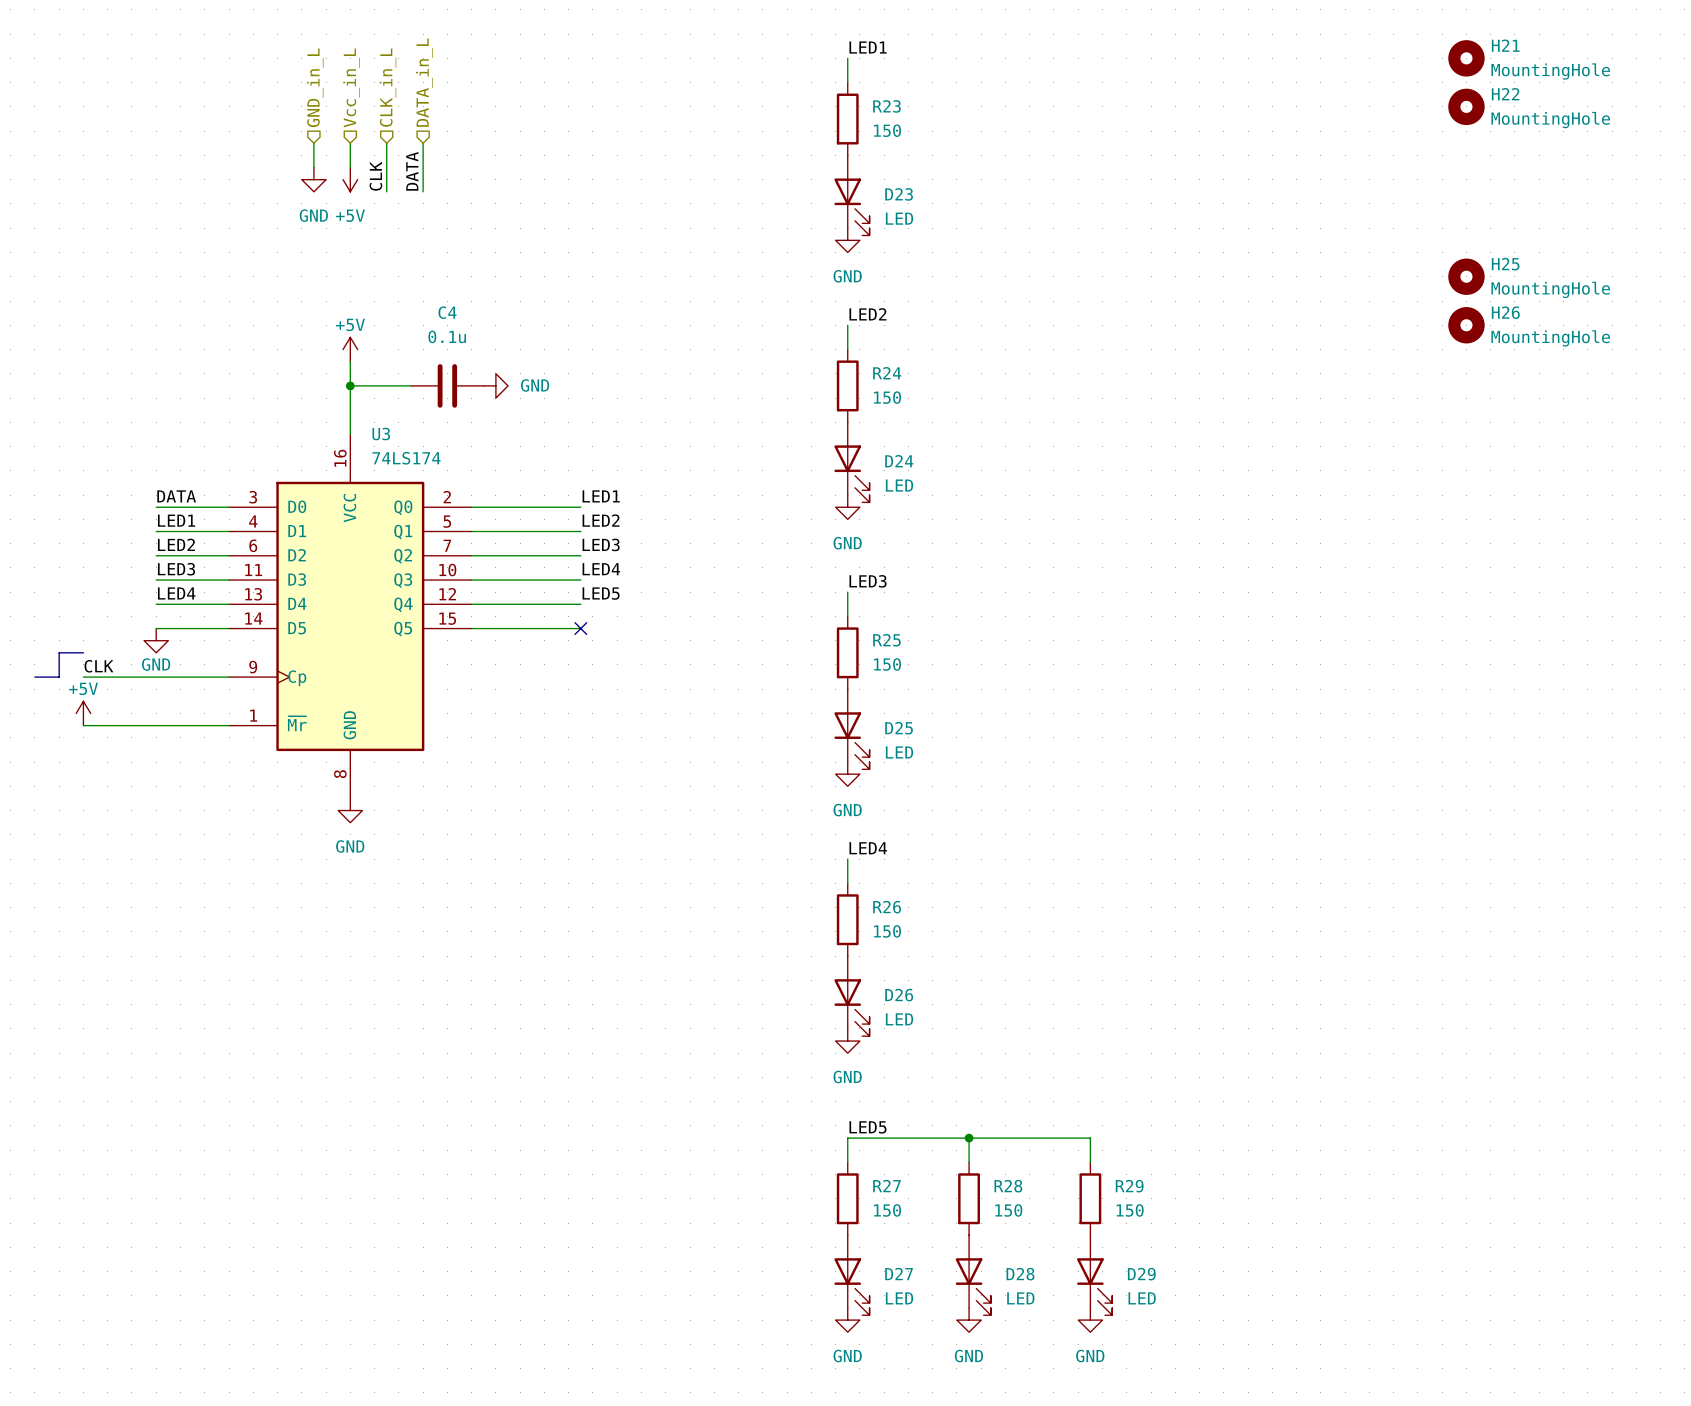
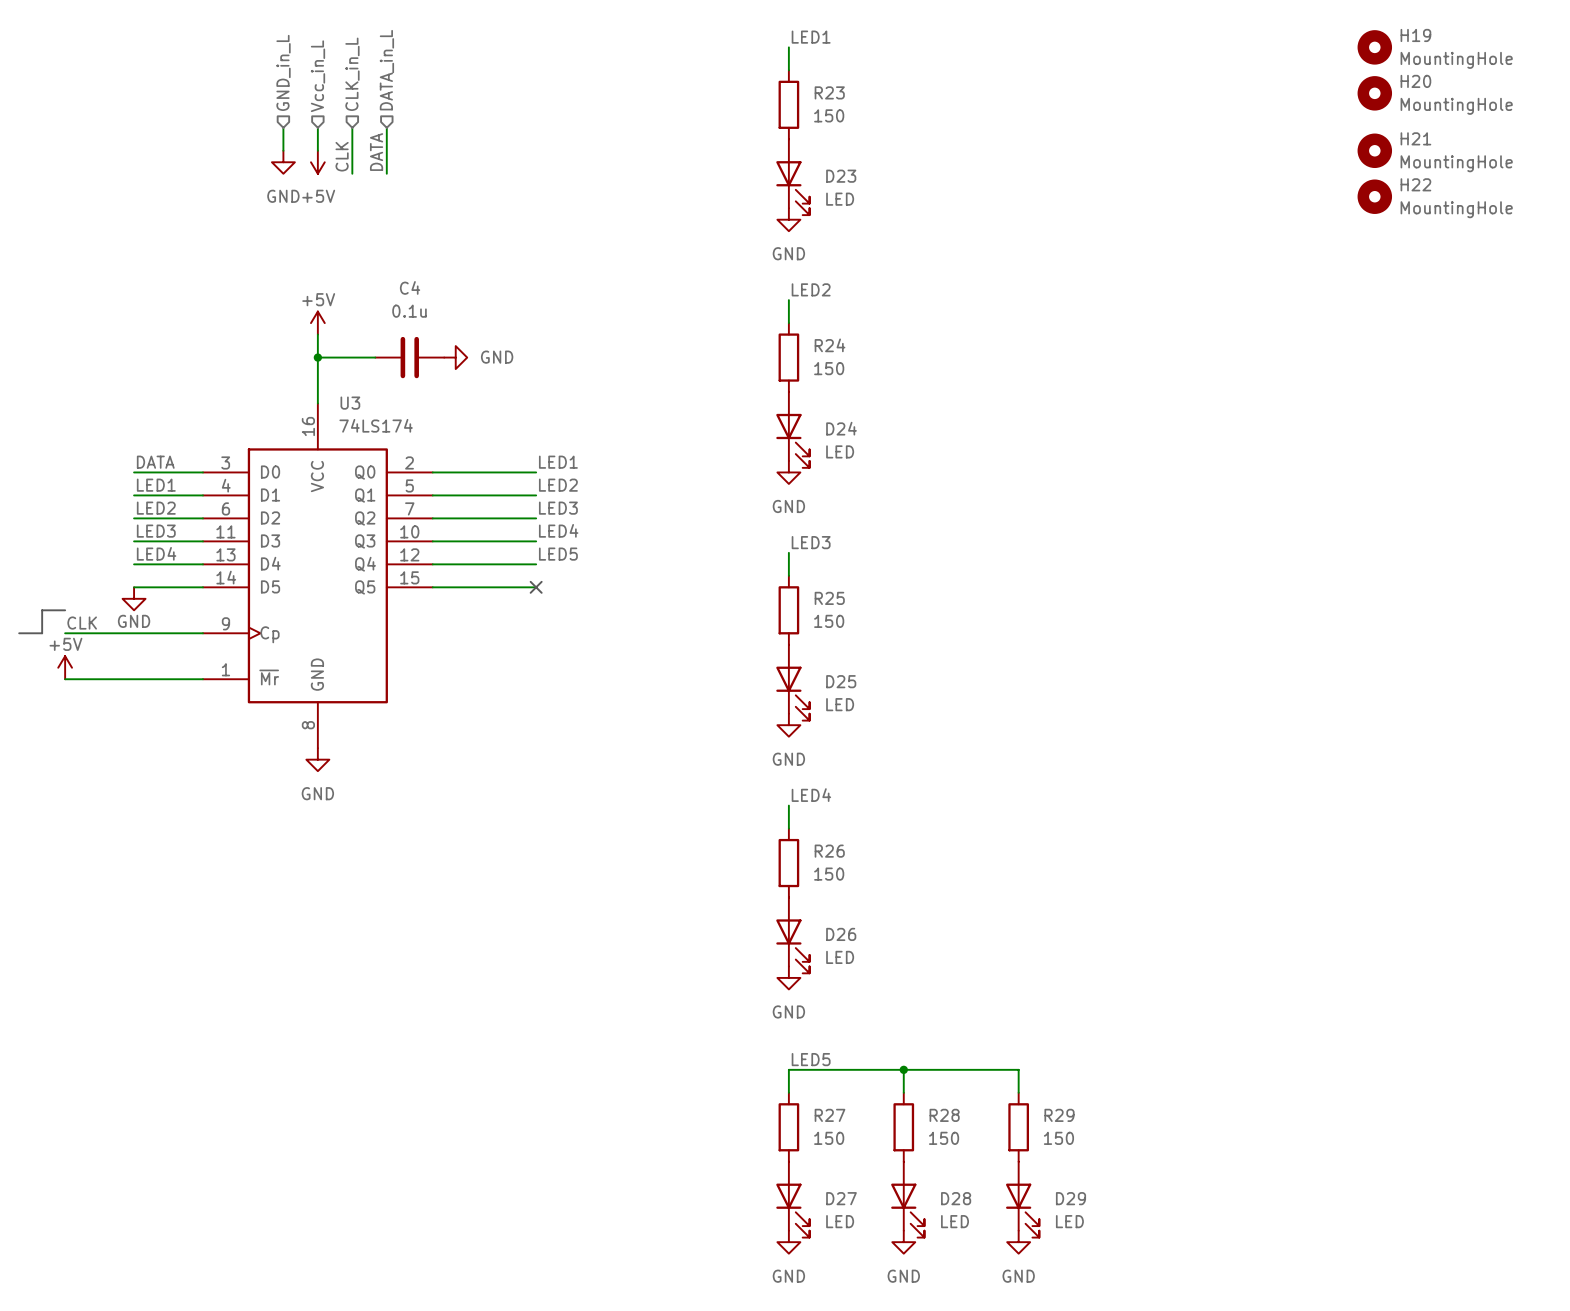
H21 name: H21 (1505, 45) -> H19 (1415, 35)
H22 name: H22 (1505, 94) -> H20 (1415, 81)
H21: none -> MountingHole (1374, 150)
H22: none -> MountingHole (1374, 196)
H25: MountingHole (1466, 276) -> none
H26: MountingHole (1466, 325) -> none

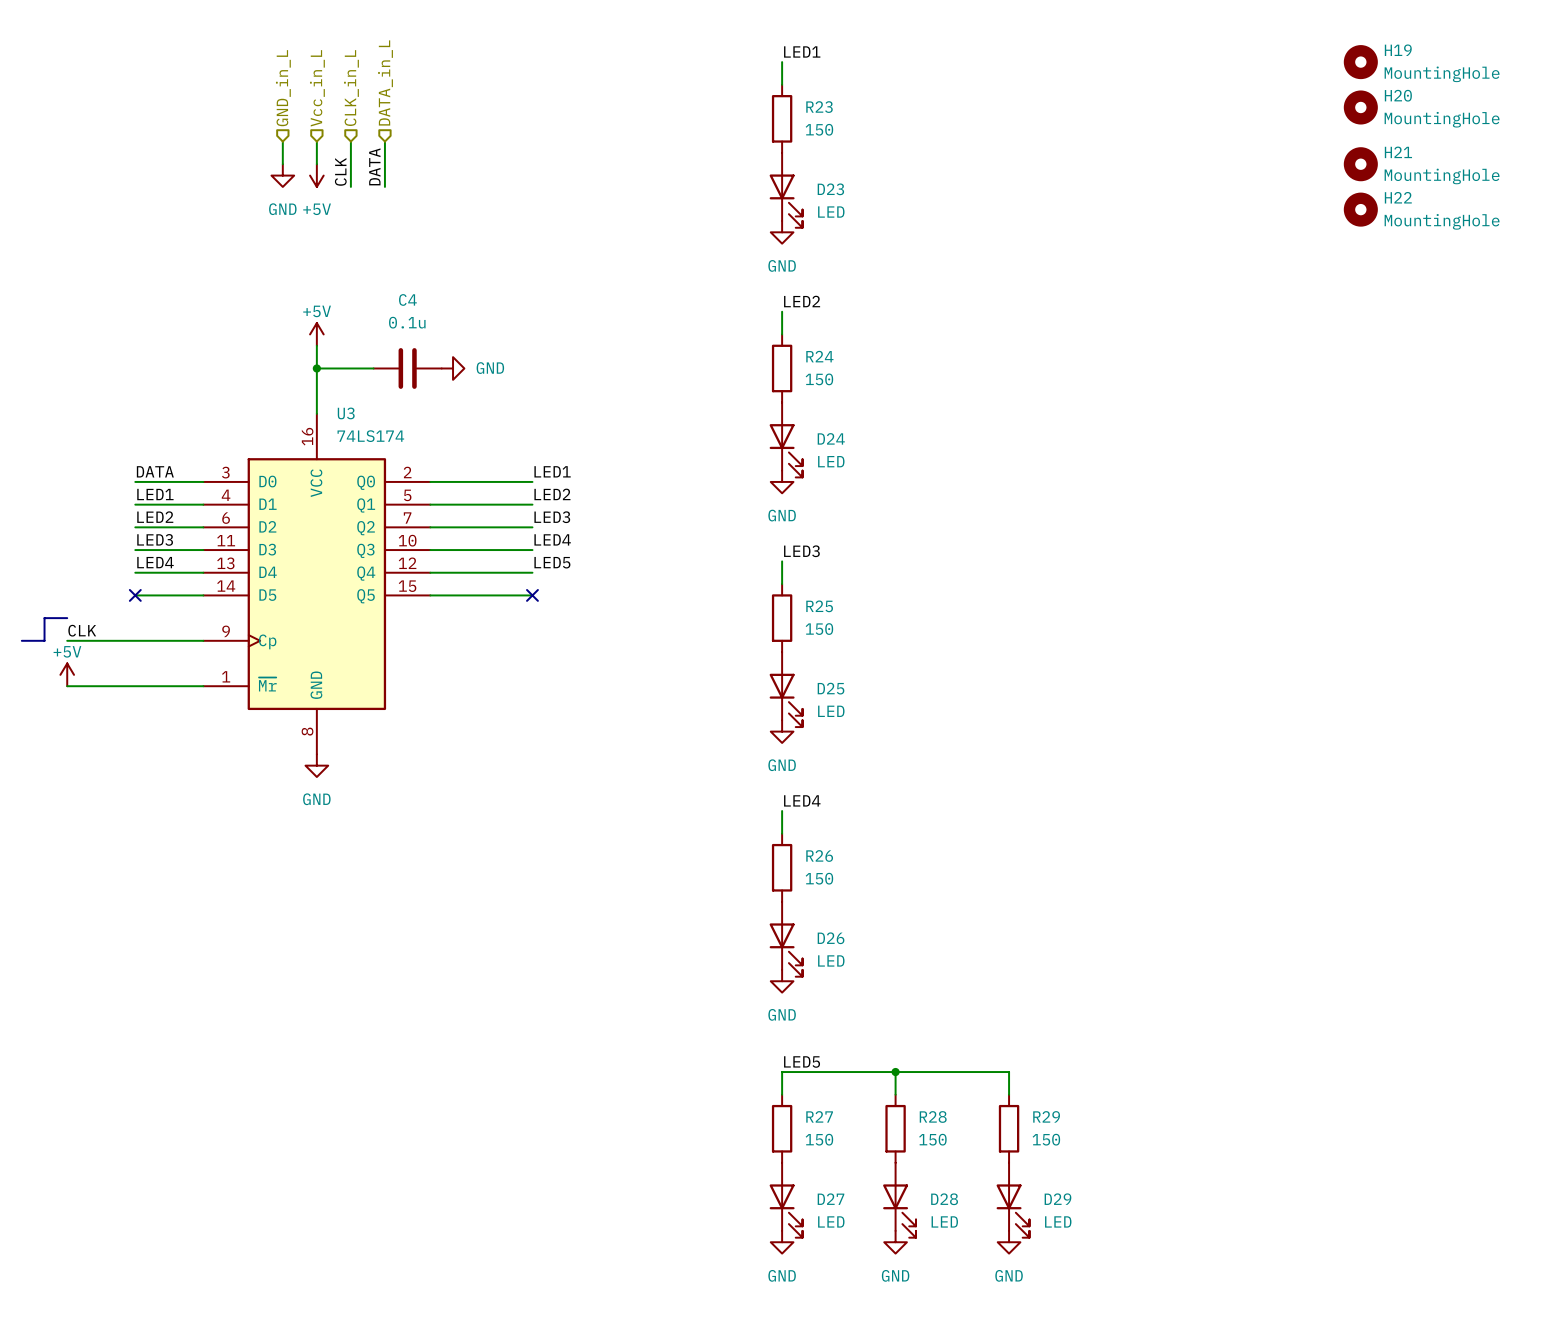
no-connect mark: none -> (135, 595)
power symbol: GND (134, 598) -> none

